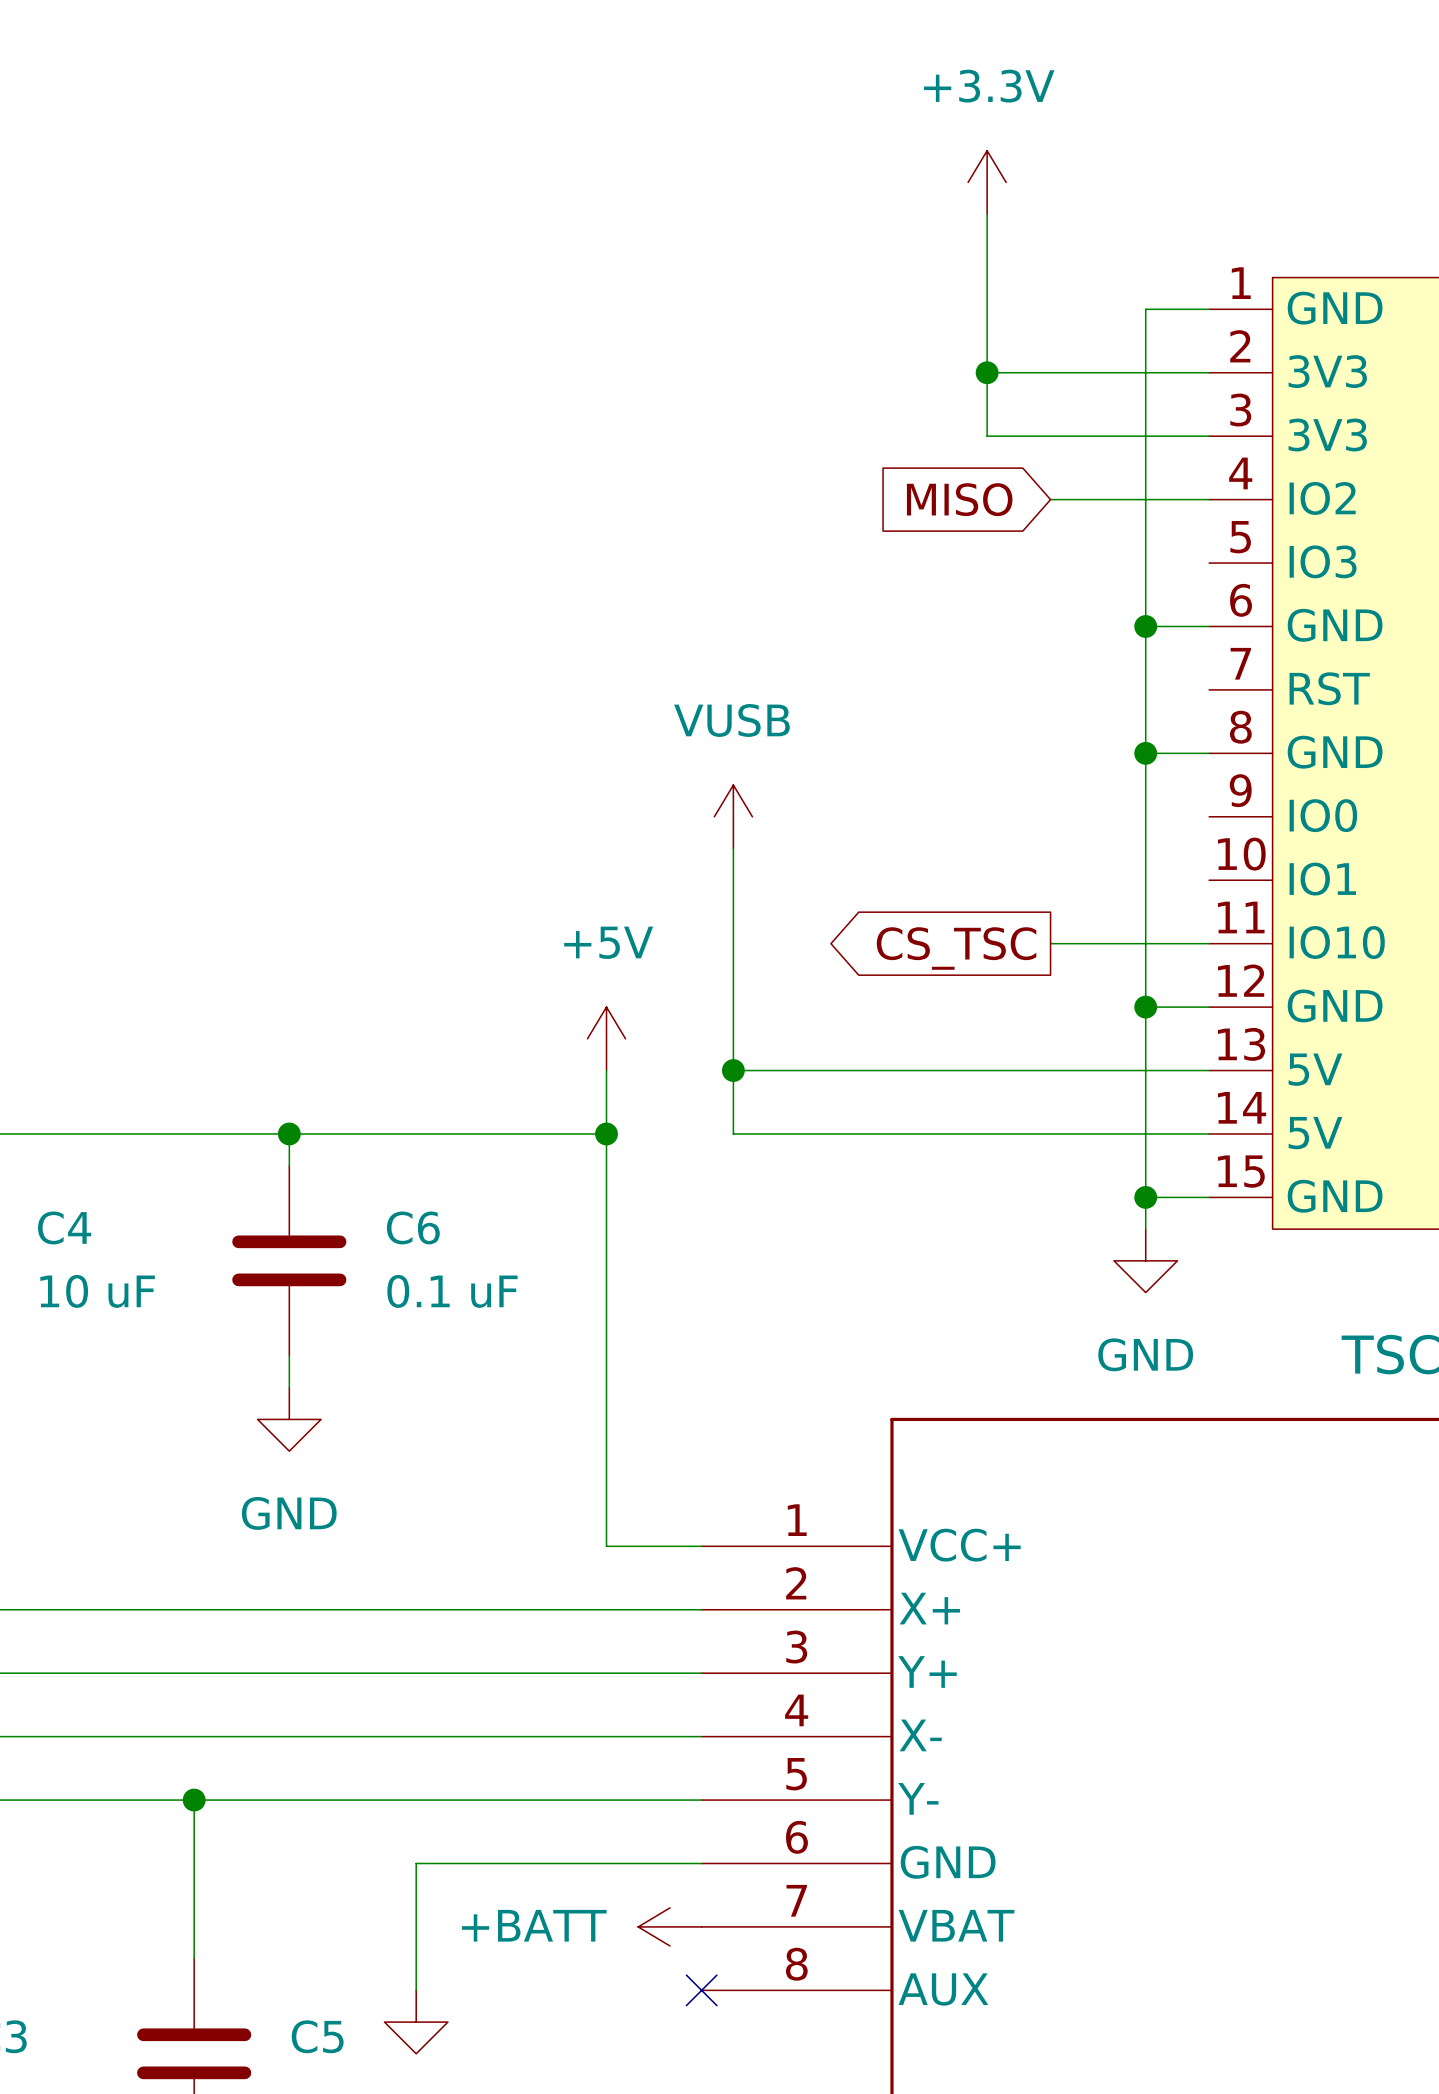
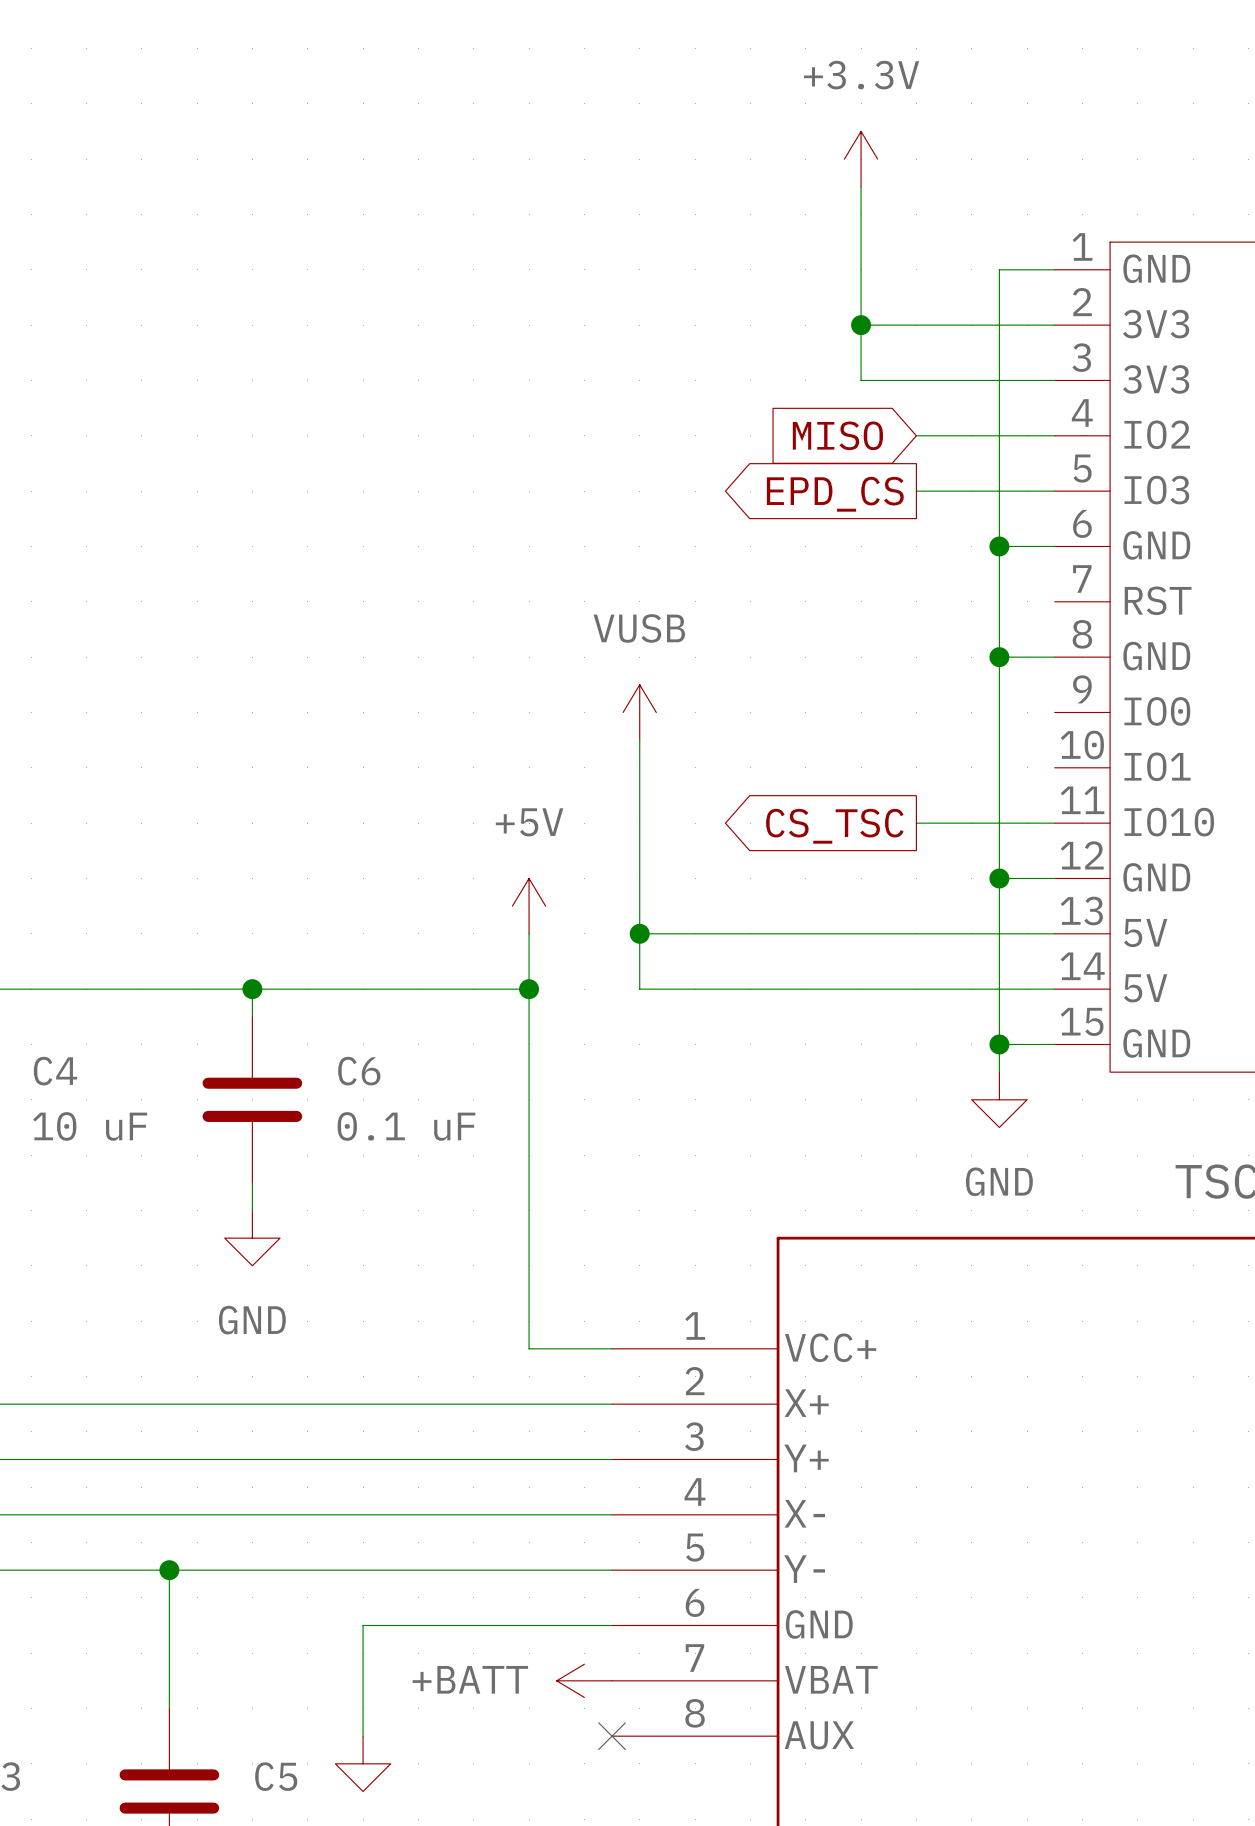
wire: none -> (916, 491) (1054, 491)
global label: none -> EPD_CS (835, 494)

